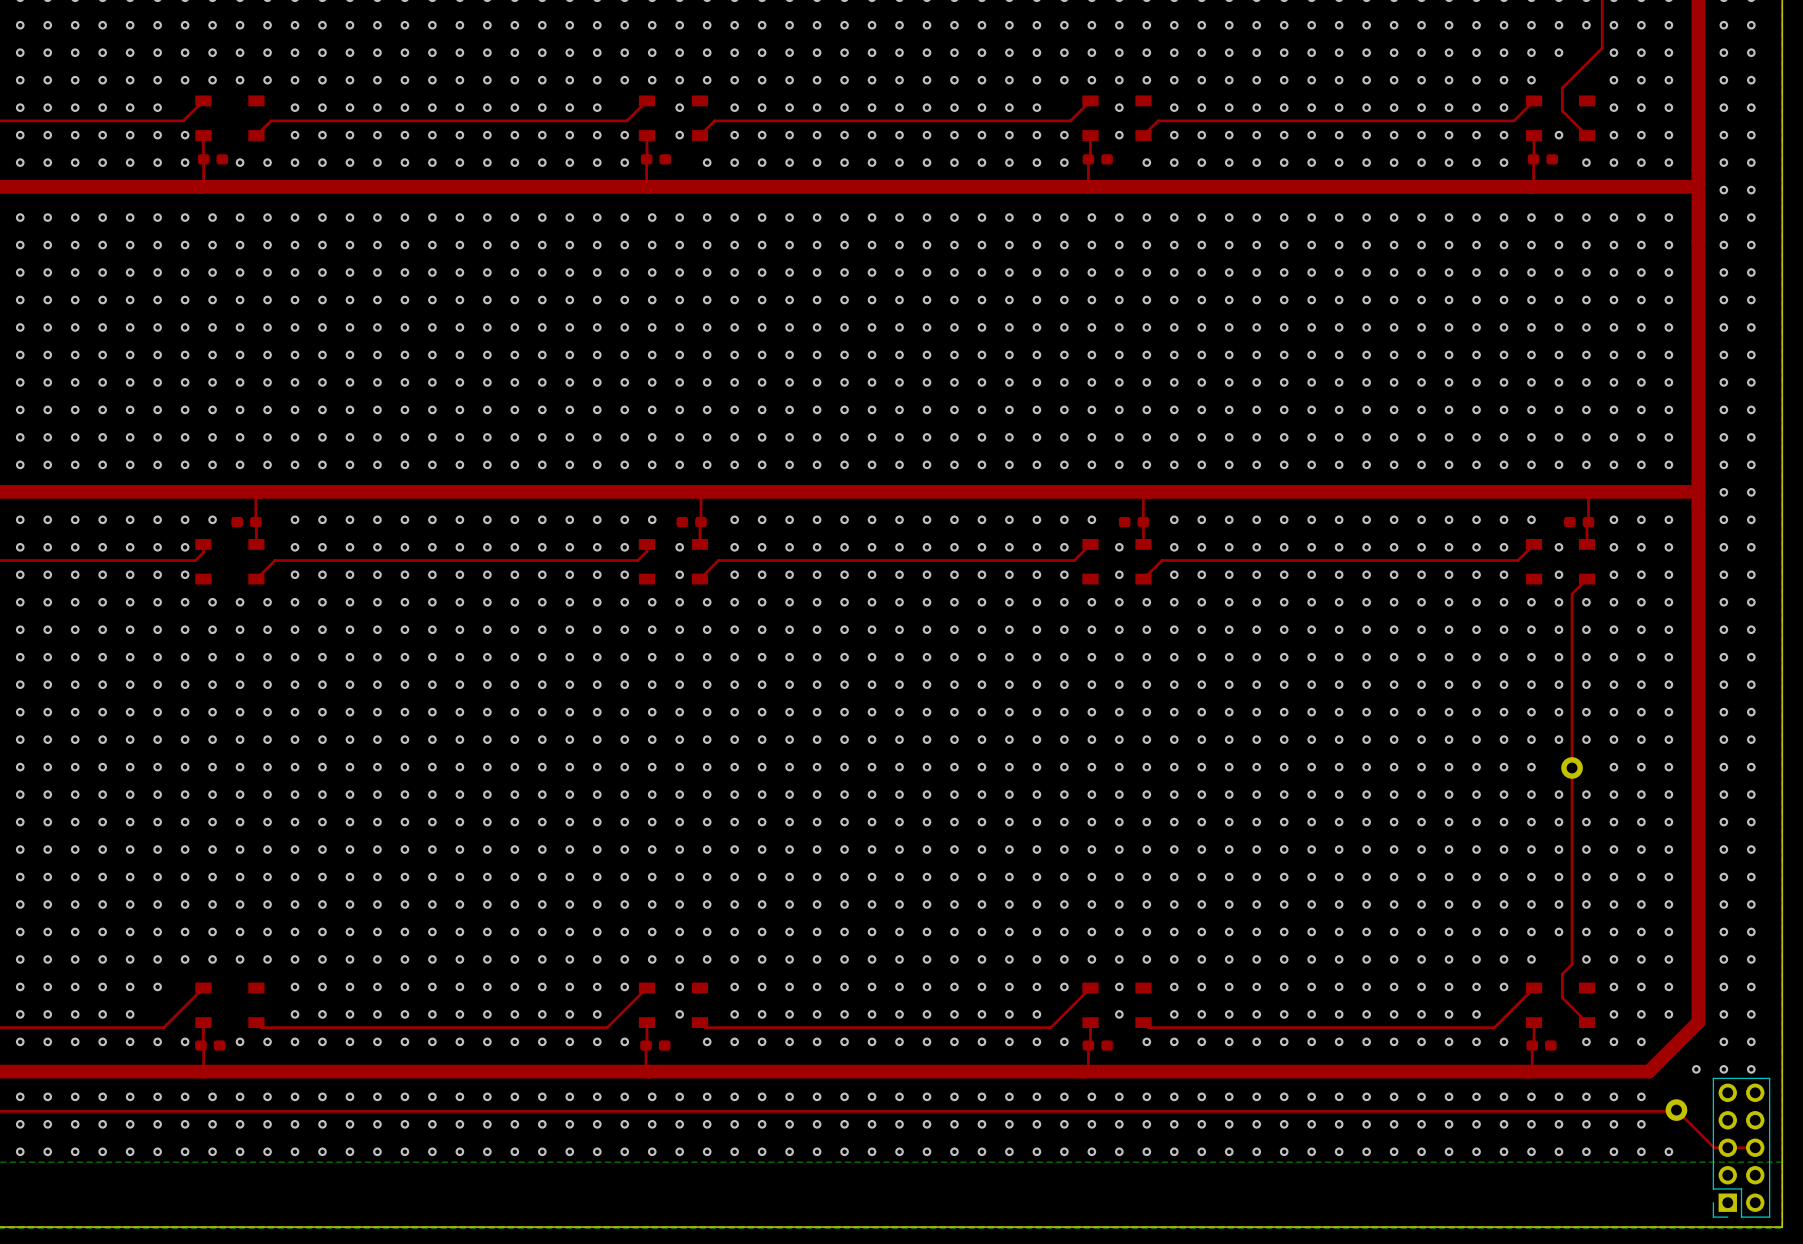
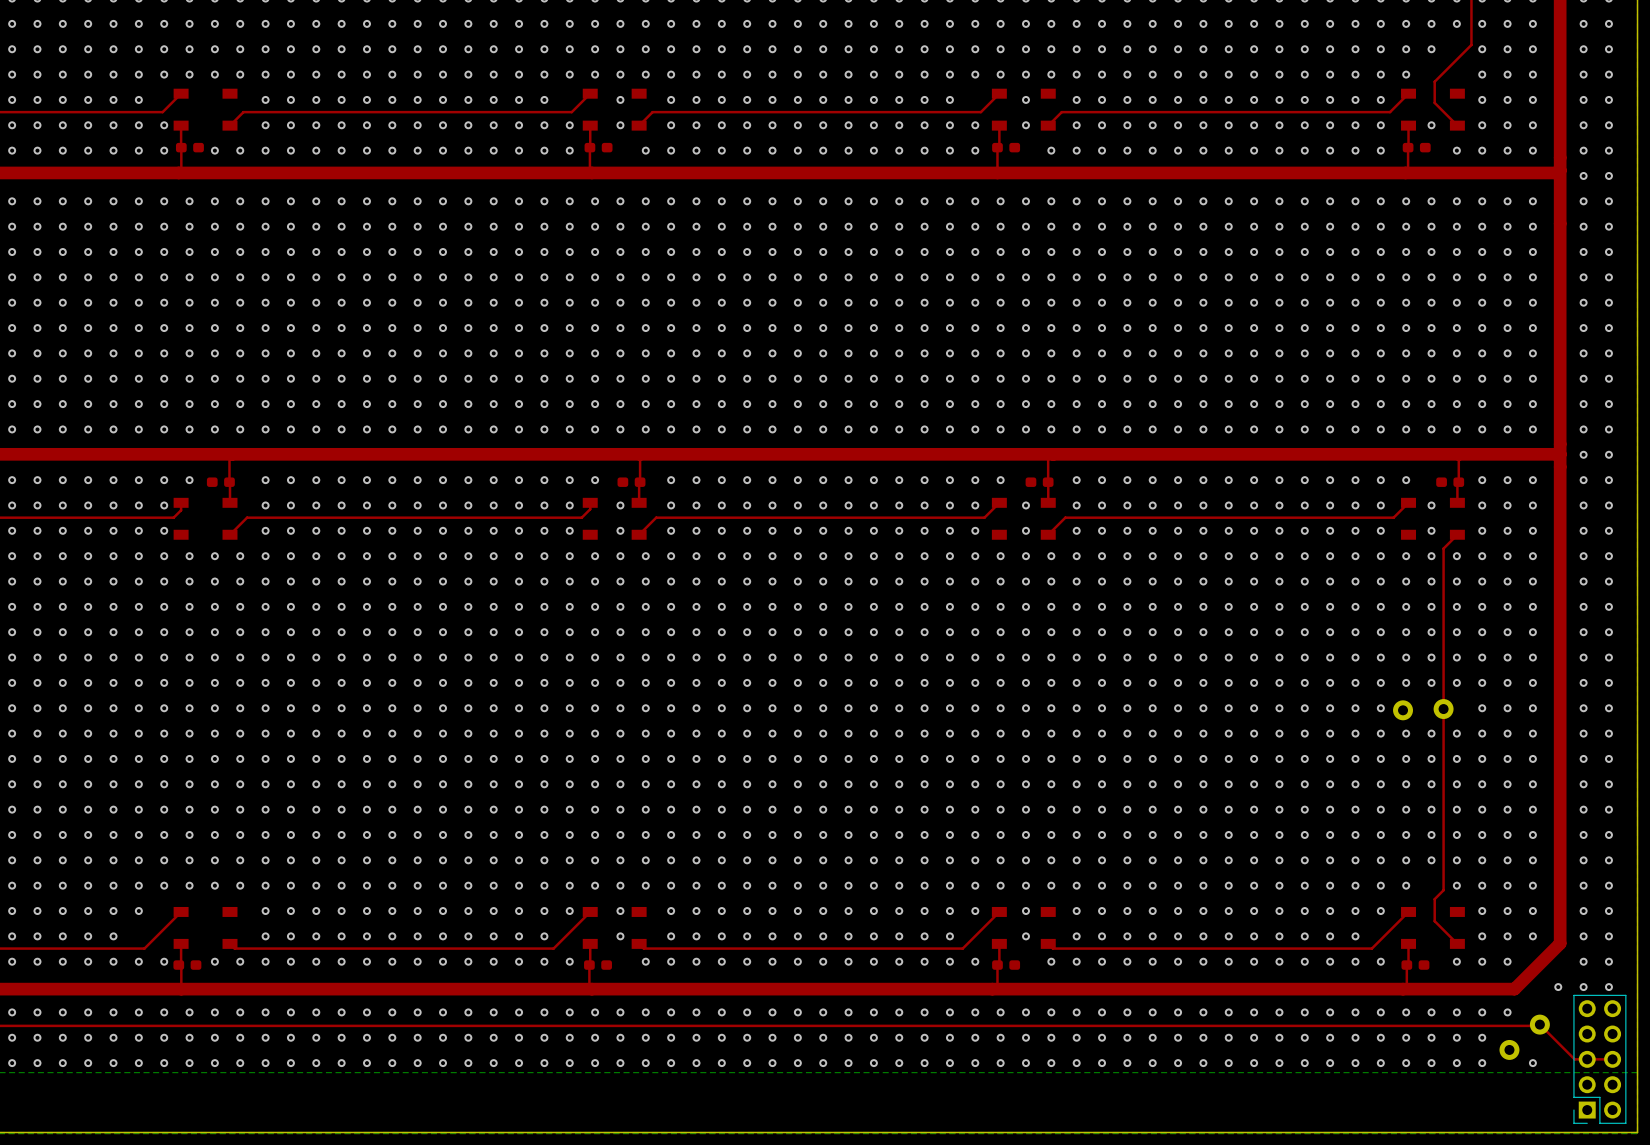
via: (1531, 767) -> none
part: none -> (1403, 710)
via: (1641, 1124) -> none
part: none -> (1509, 1049)
via: (1641, 1151) -> none

